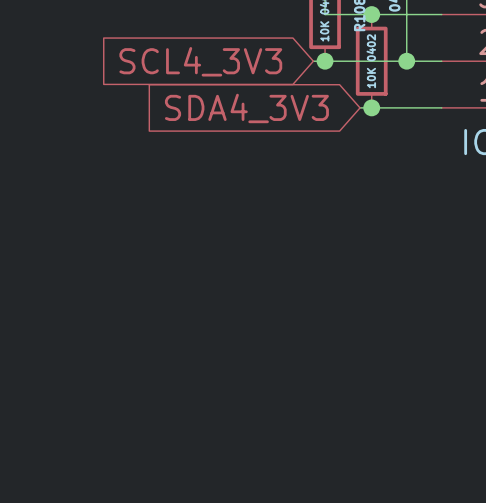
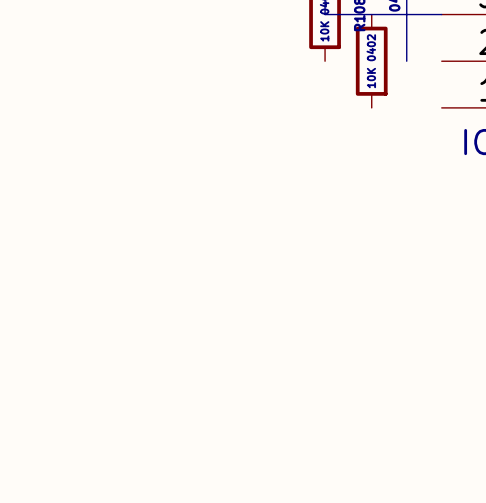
junction: (371, 14) -> none
global label: SCL4_3V3 (200, 61) -> none
wire: (313, 61) (441, 61) -> none
junction: (325, 61) -> none
junction: (406, 61) -> none
wire: (360, 107) (441, 107) -> none
junction: (371, 107) -> none
global label: SDA4_3V3 (246, 108) -> none

